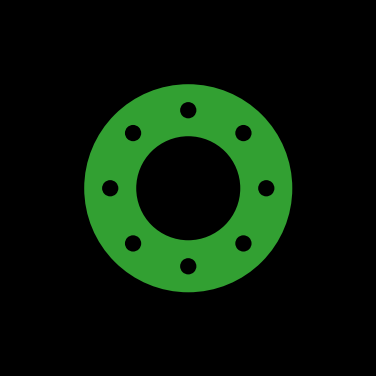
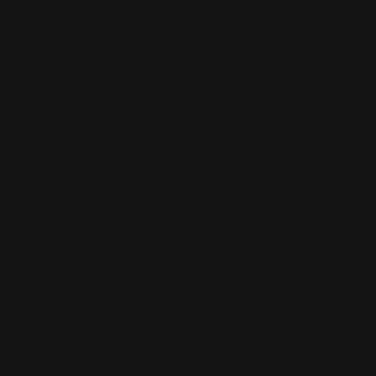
part: (188, 188) -> none

